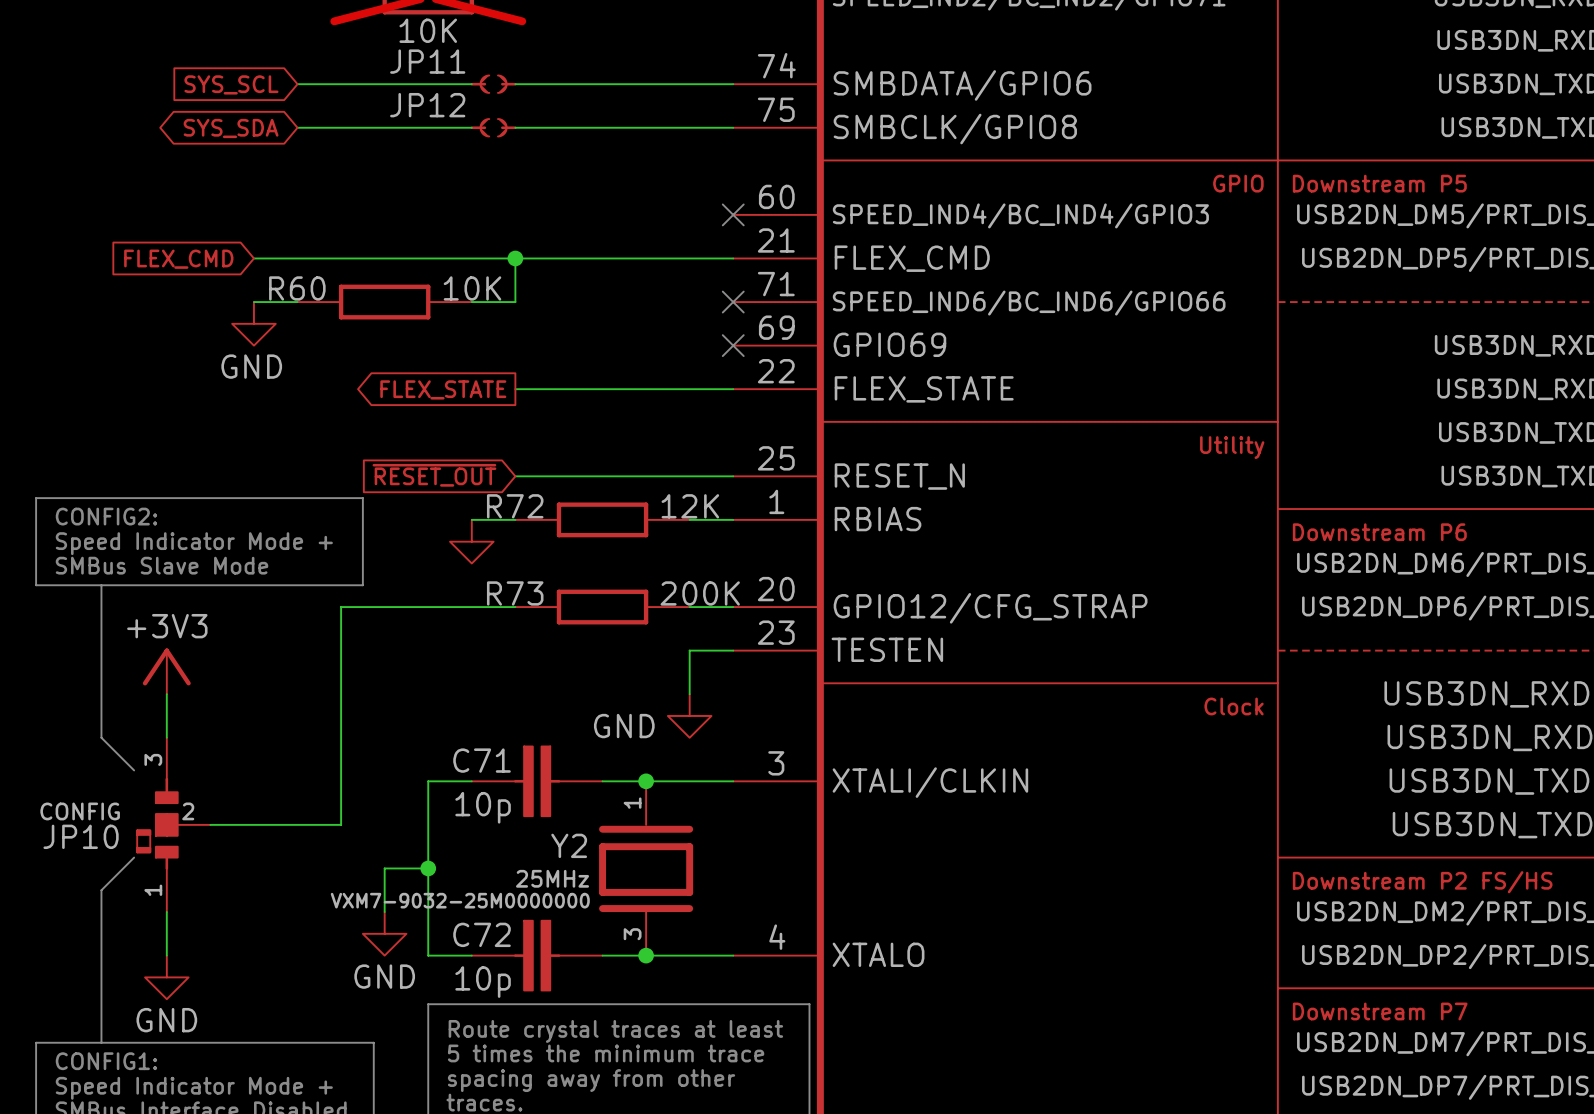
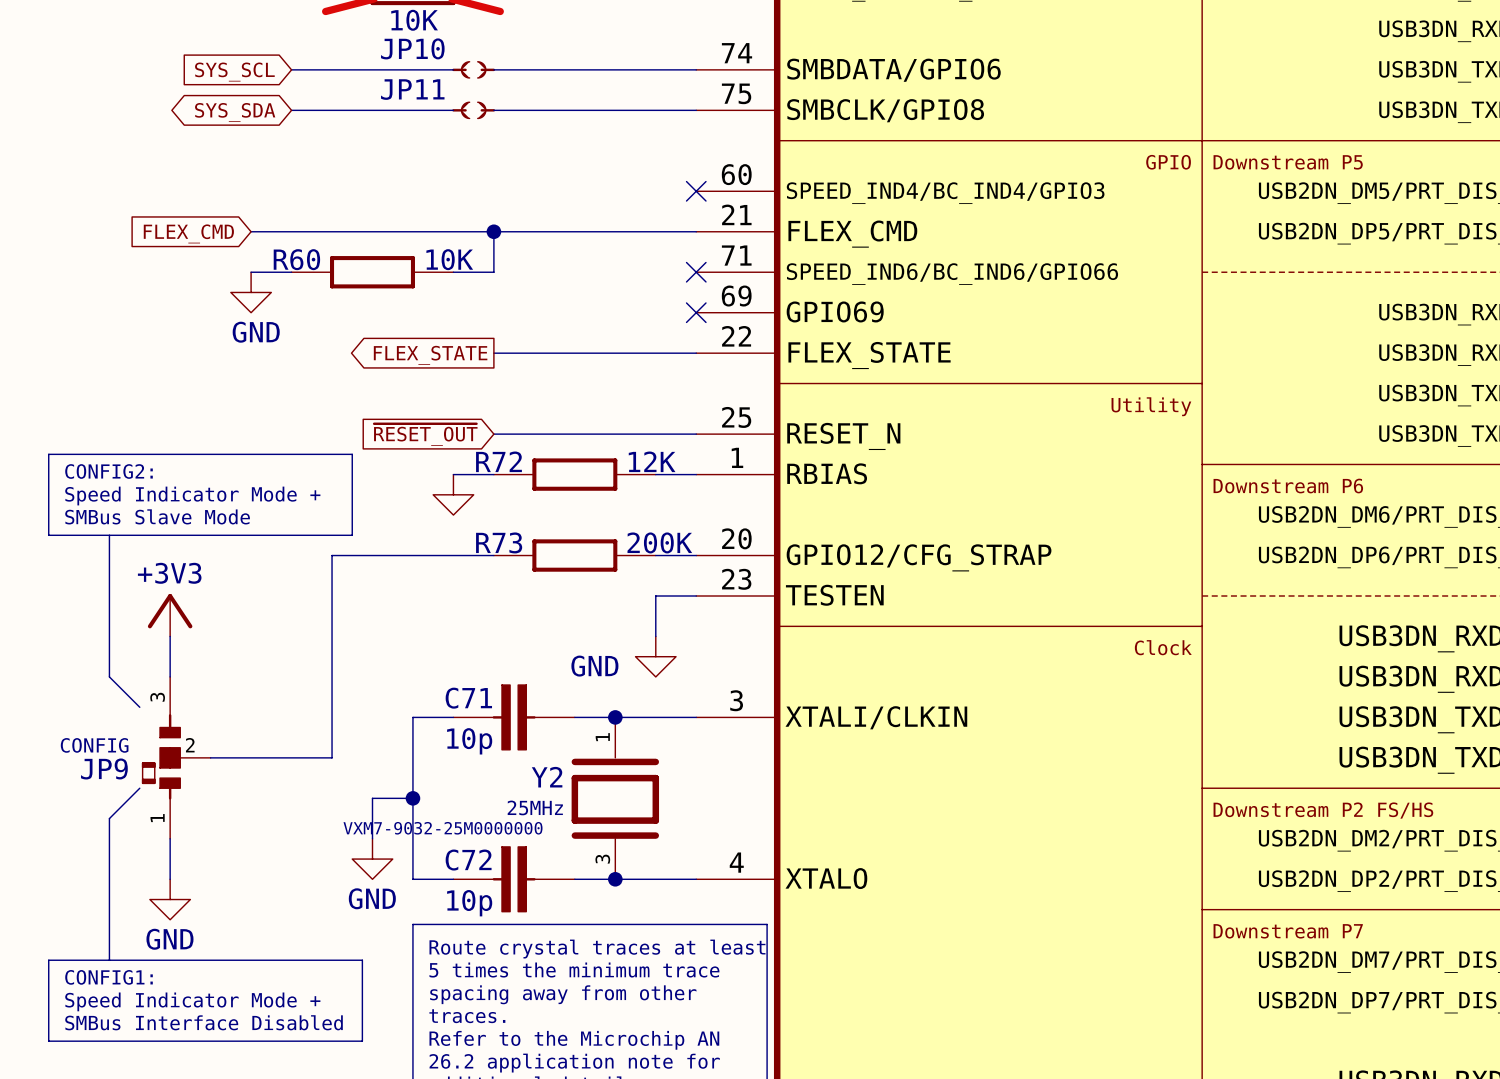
JP11 name: JP11 (427, 61) -> JP10 (412, 48)
JP12 name: JP12 (427, 105) -> JP11 (412, 89)
JP10 name: JP10 (81, 836) -> JP9 (104, 768)

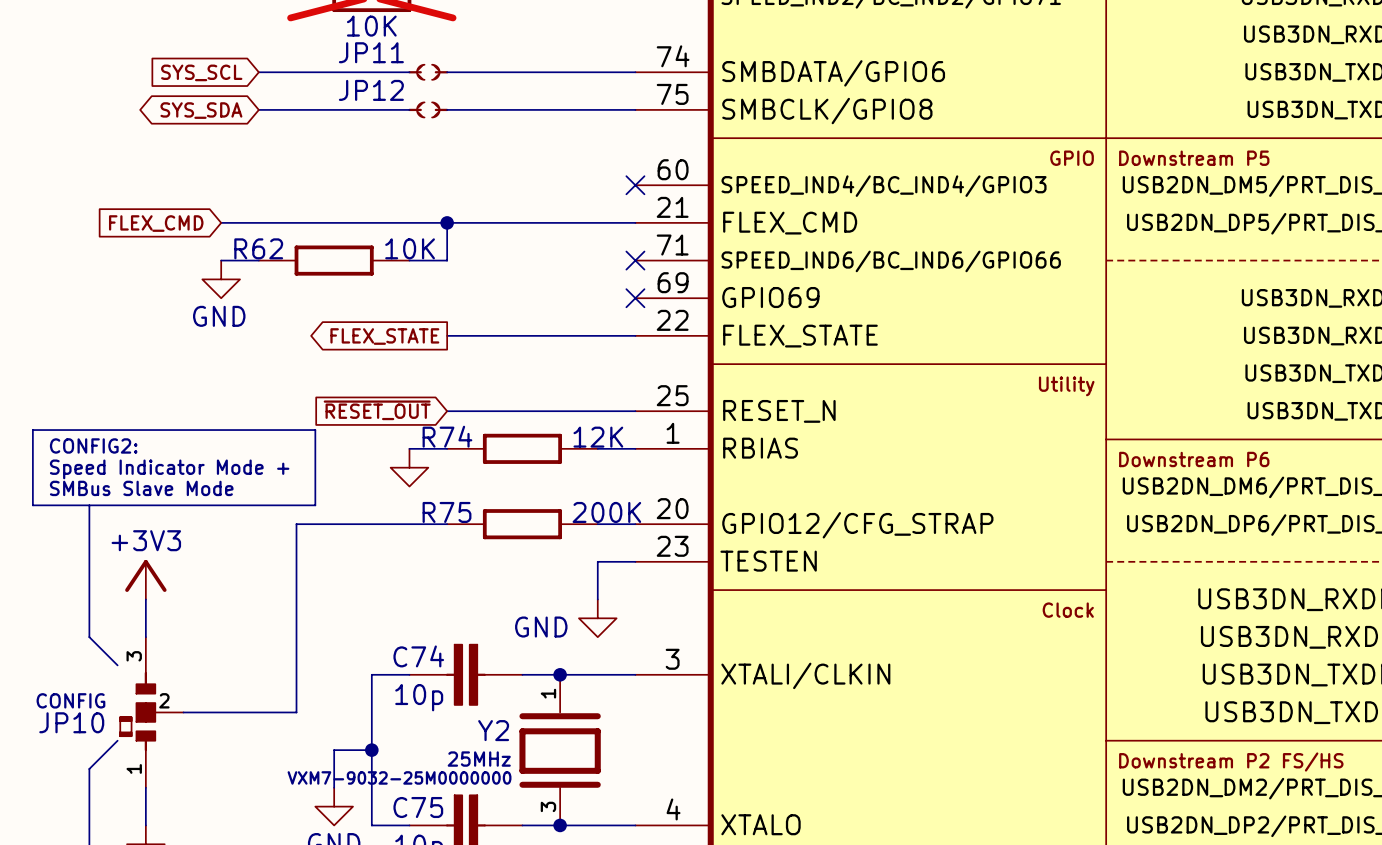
JP10 name: JP10 (412, 48) -> JP11 (371, 52)
JP11 name: JP11 (412, 89) -> JP12 (371, 90)
R60 name: R60 (296, 259) -> R62 (258, 248)
R72 name: R72 (498, 461) -> R74 (447, 436)
R73 name: R73 (499, 542) -> R75 (447, 512)
C71 name: C71 (468, 698) -> C74 (418, 656)
JP9 name: JP9 (104, 768) -> JP10 (71, 722)
C72 name: C72 (468, 860) -> C75 (418, 807)

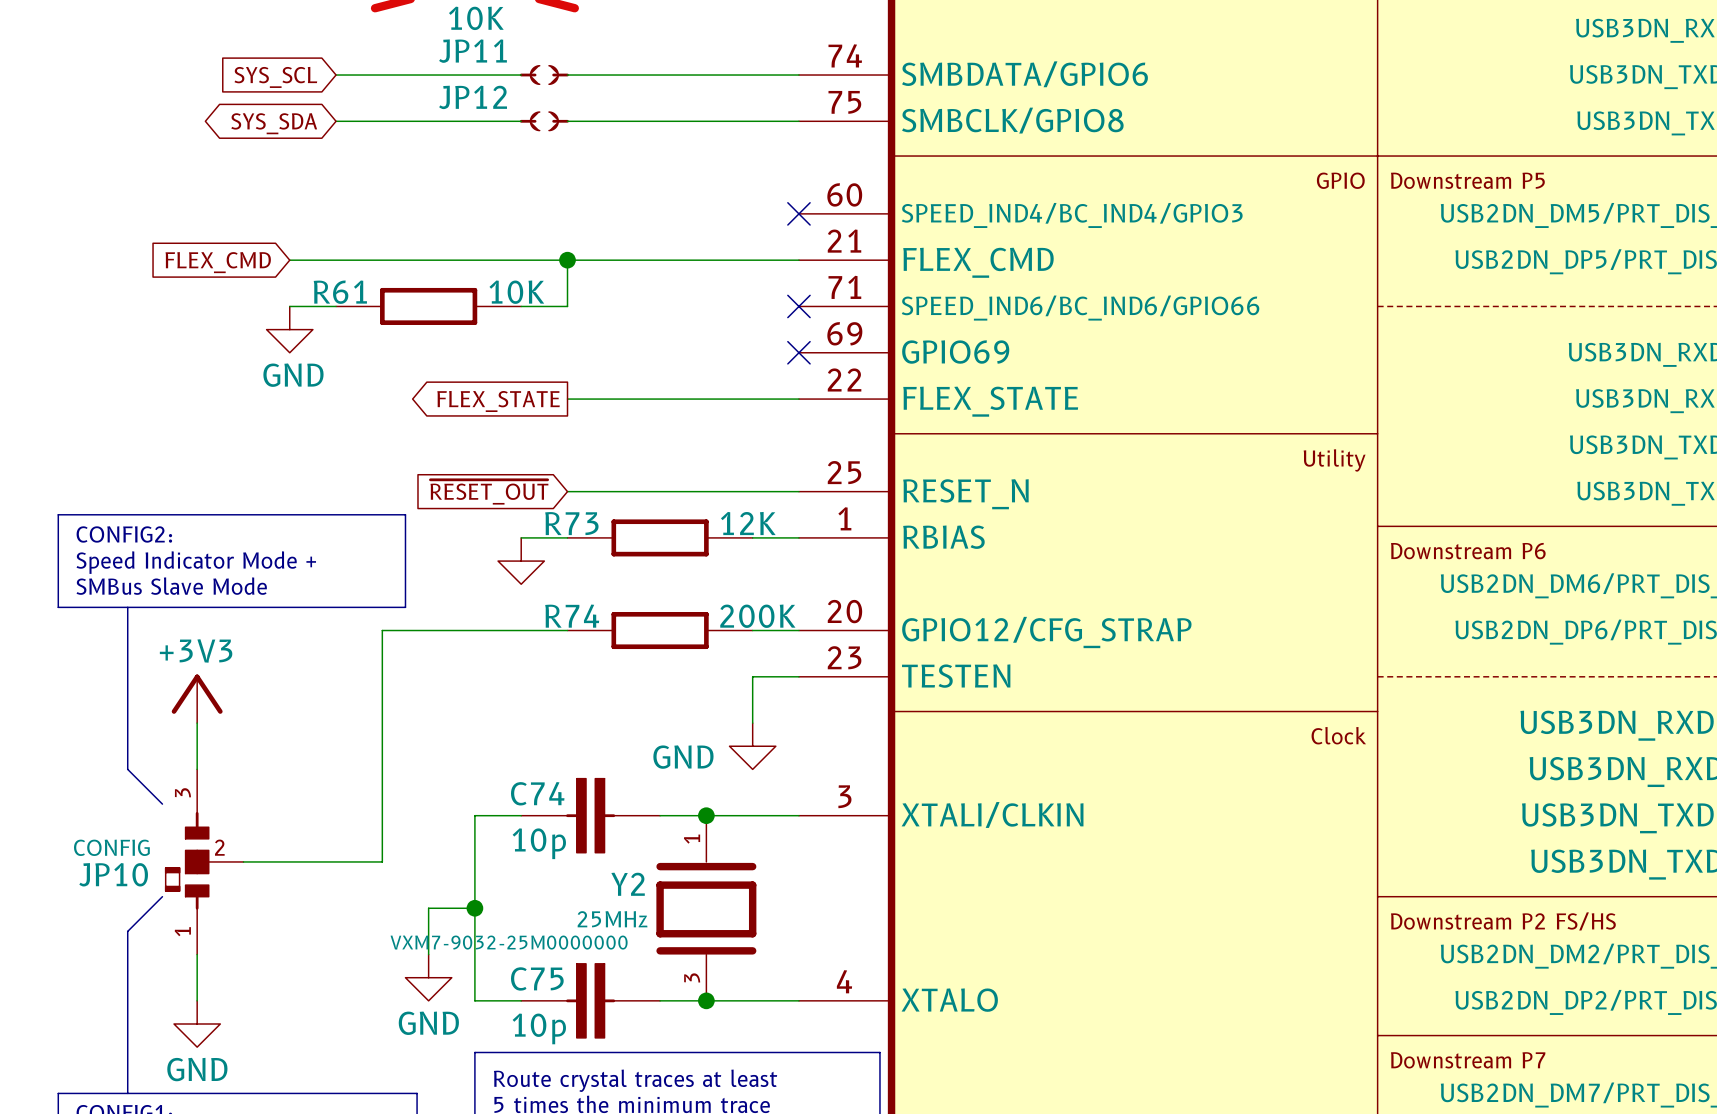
R62 name: R62 (258, 248) -> R61 (340, 292)
R74 name: R74 (447, 436) -> R73 (571, 523)
R75 name: R75 (447, 512) -> R74 (572, 616)

